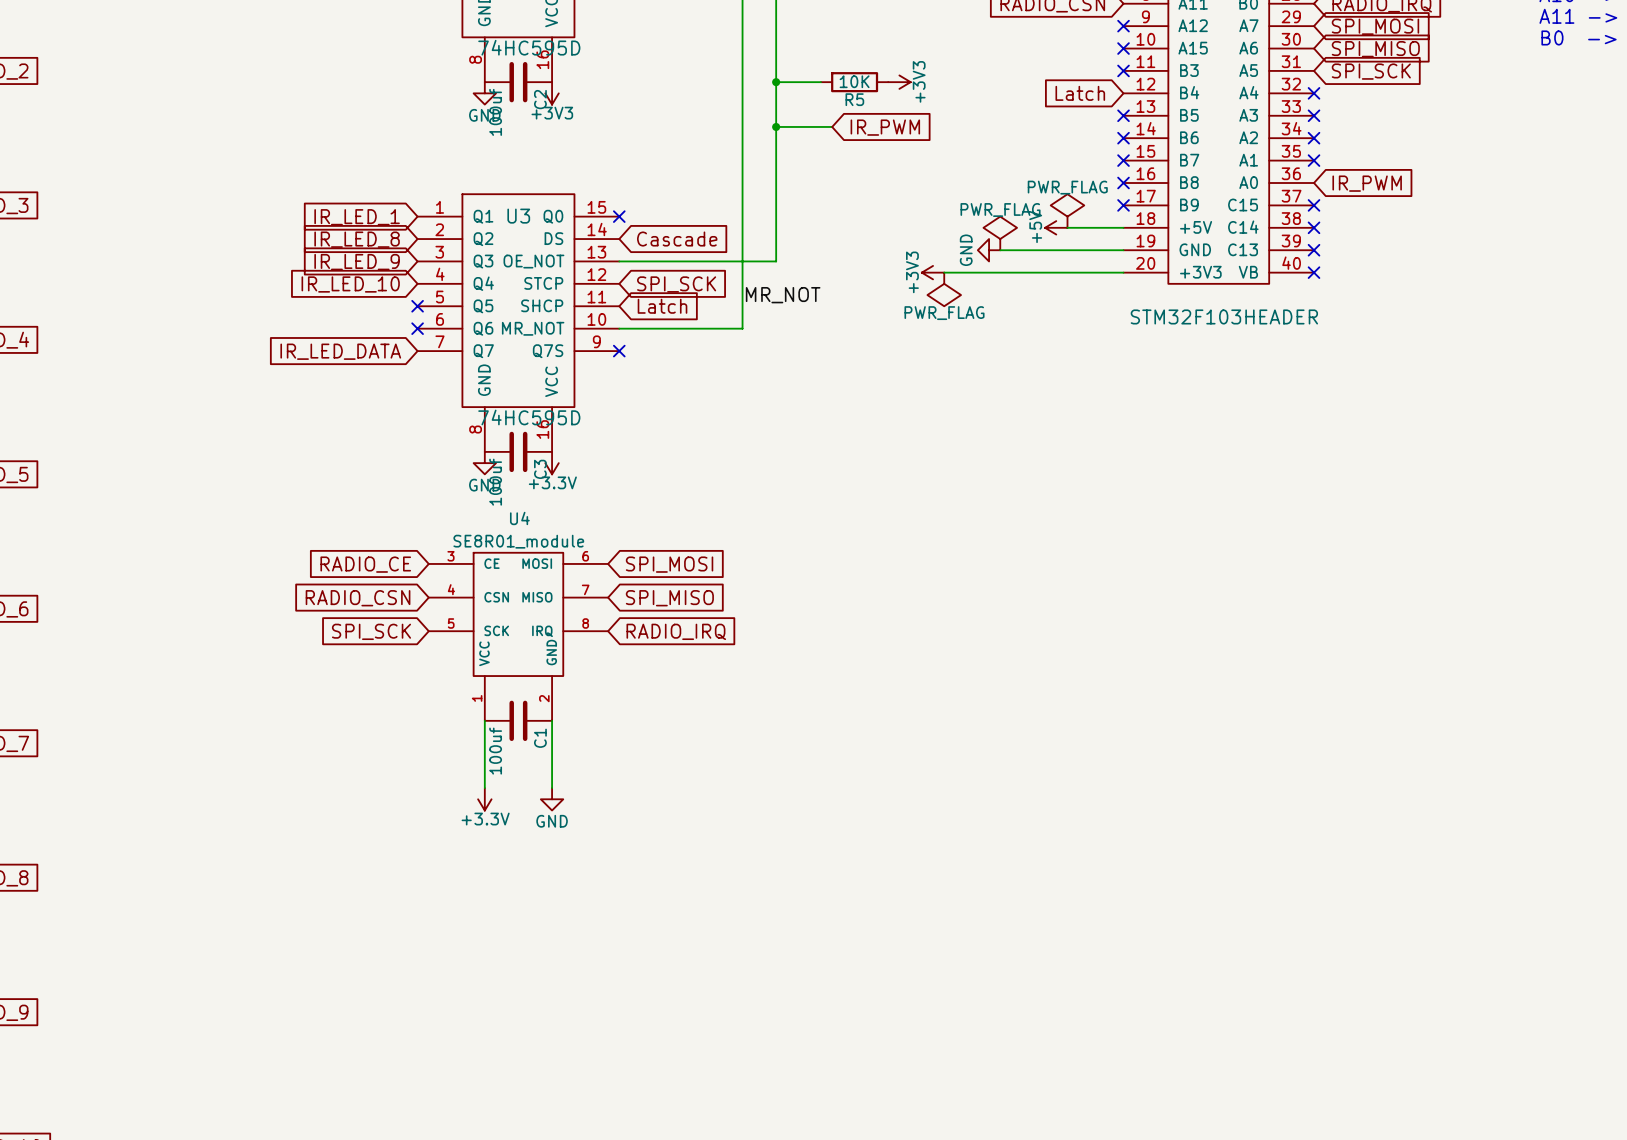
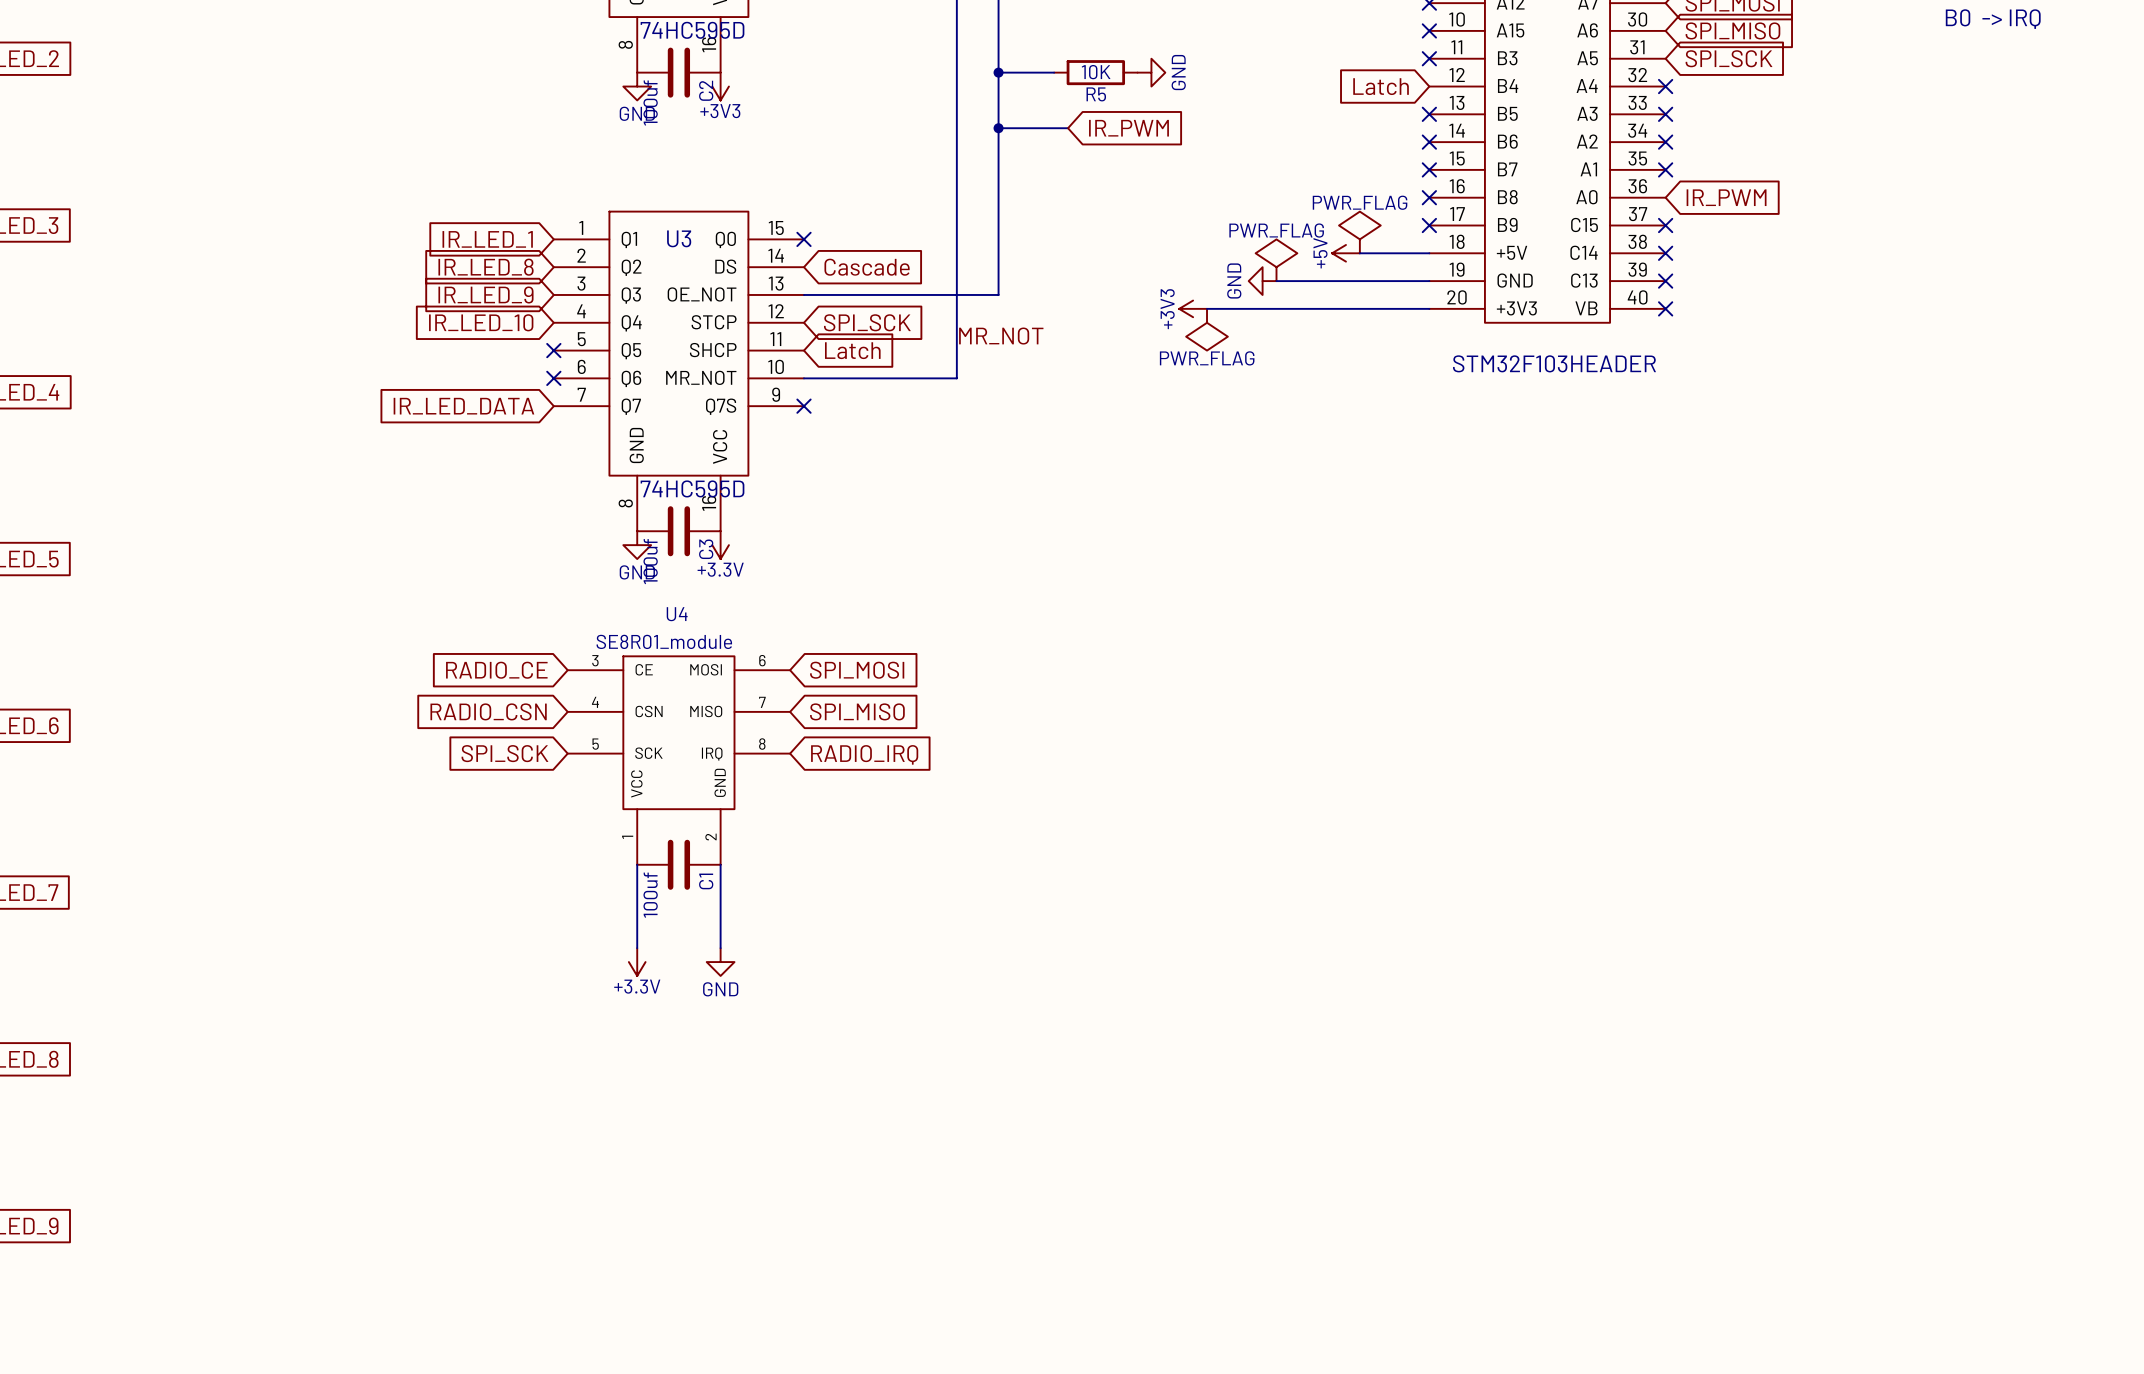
power symbol: +3V3 (899, 82) -> GND (1151, 72)

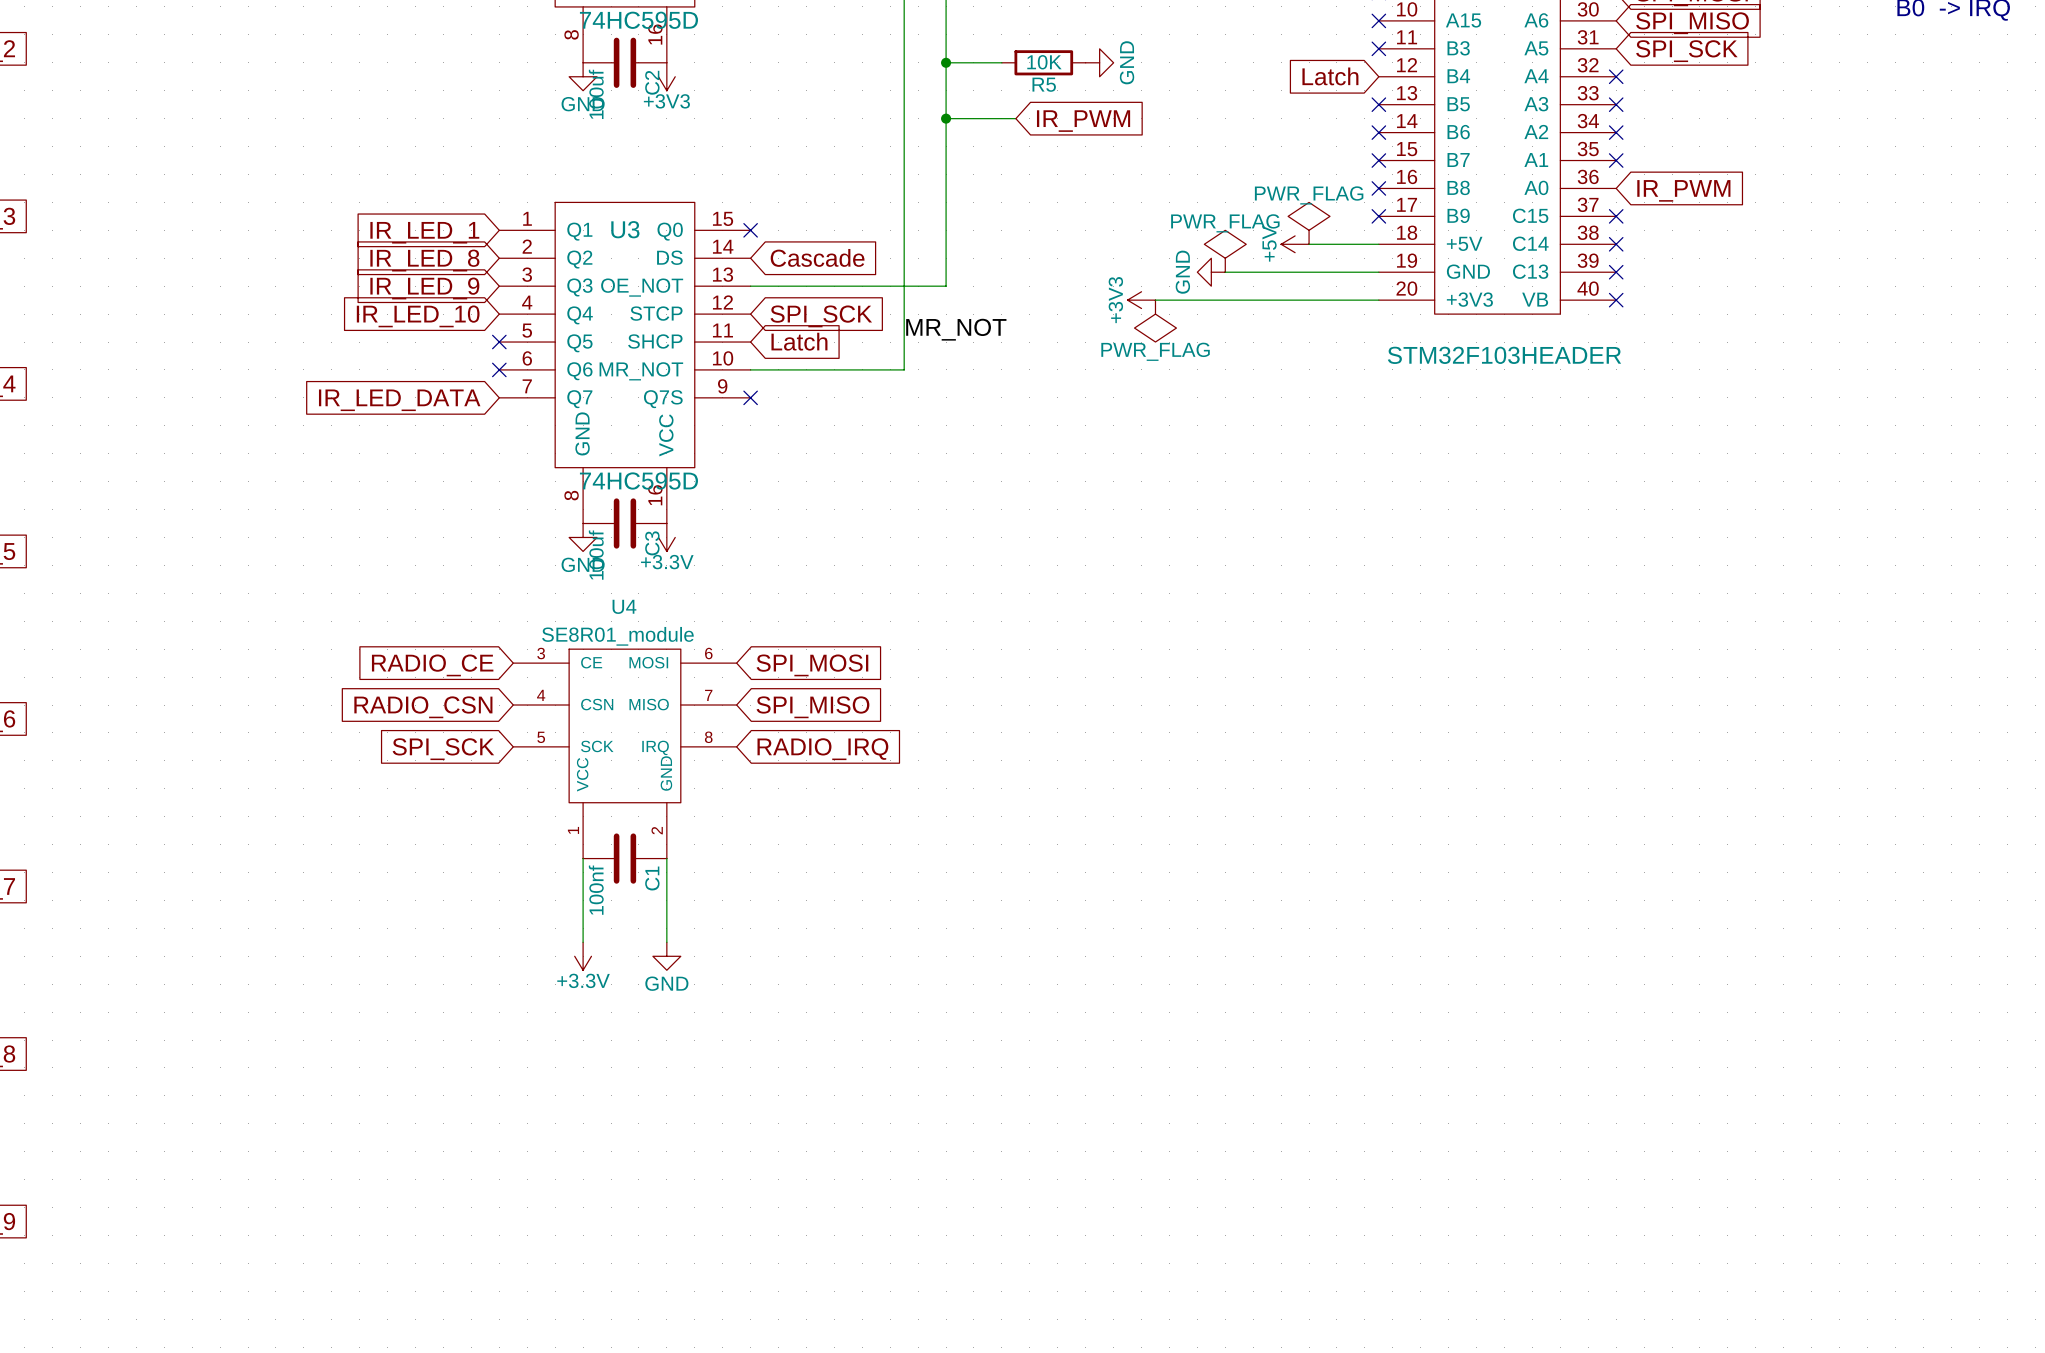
C1 value: 100uf (650, 895) -> 100nf (596, 890)

